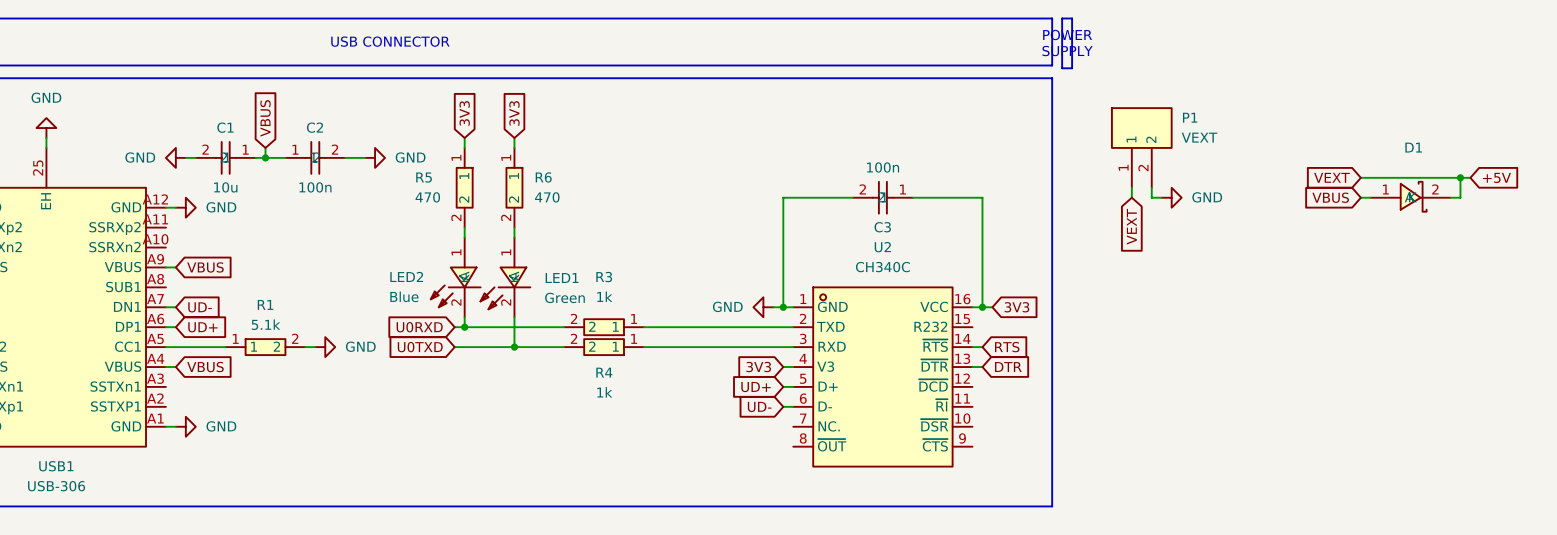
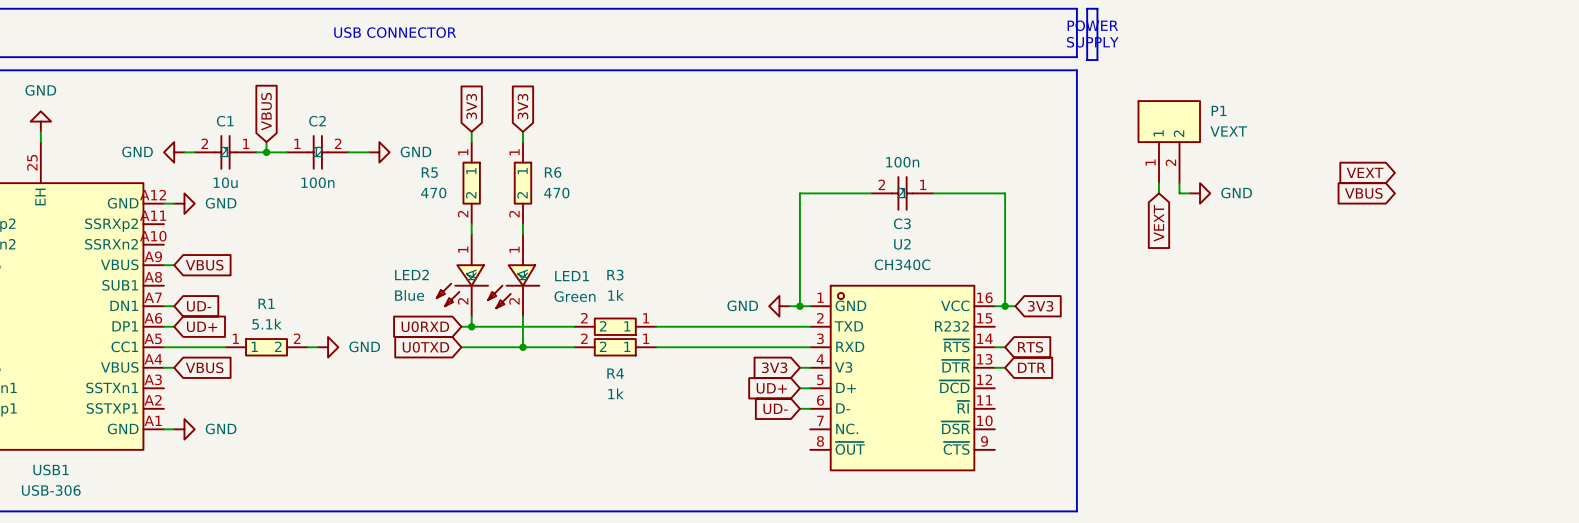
wire: (1360, 177) (1470, 177) -> none
wire: (1460, 177) (1460, 197) (1450, 197) -> none
junction: (1460, 177) -> none
global label: +5V (1497, 177) -> none
D1: (1410, 196) -> none
wire: (1360, 197) (1370, 197) -> none

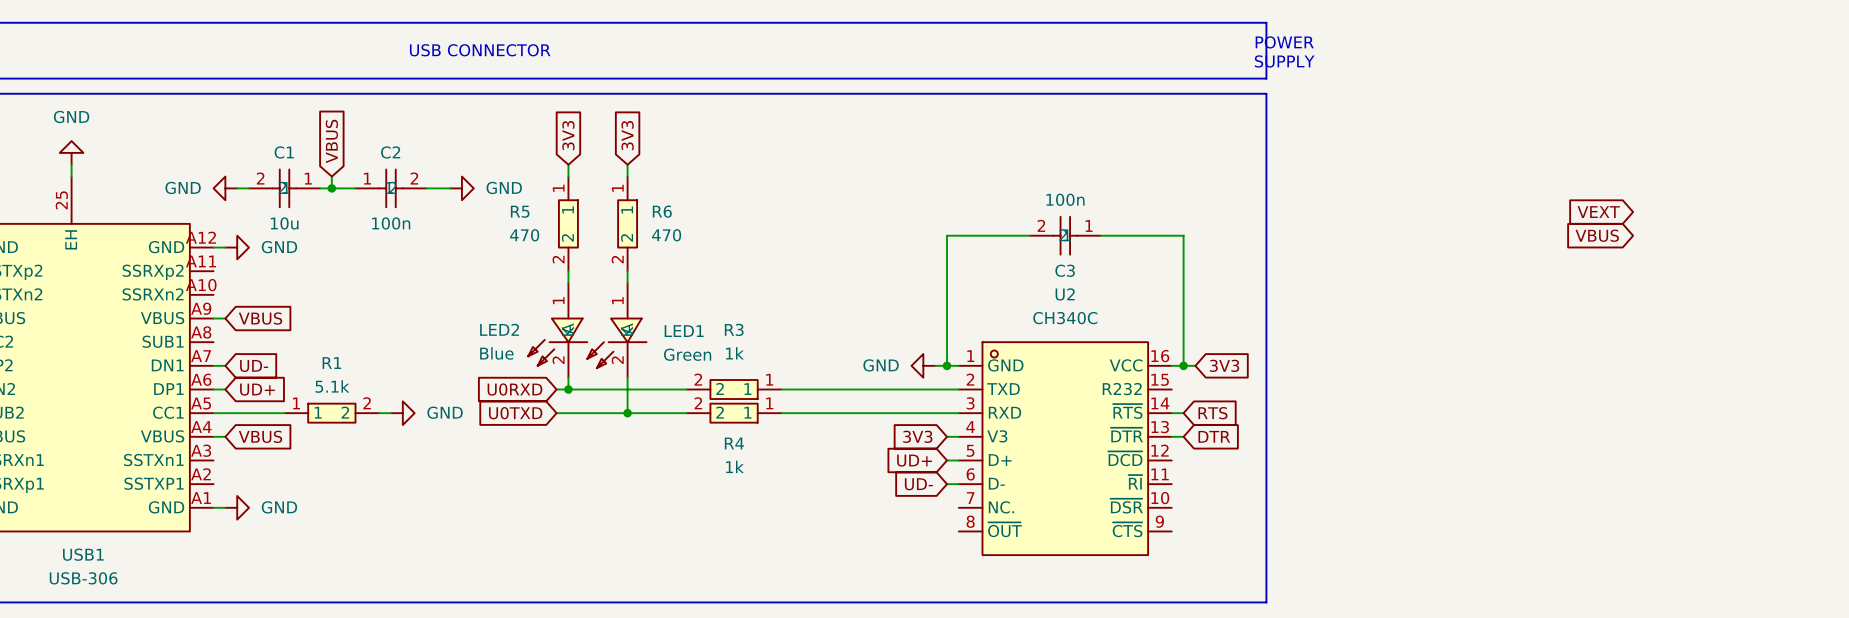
line: (1087, 8) (1097, 8) (1097, 60) (1087, 60) (1087, 8) -> none
P1: VEXT (1169, 142) -> none
wire: (1158, 183) (1158, 193) -> none
wire: (1179, 183) (1179, 193) (1189, 193) -> none
power symbol: GND (1200, 193) -> none
global label: VEXT (1158, 223) -> none

